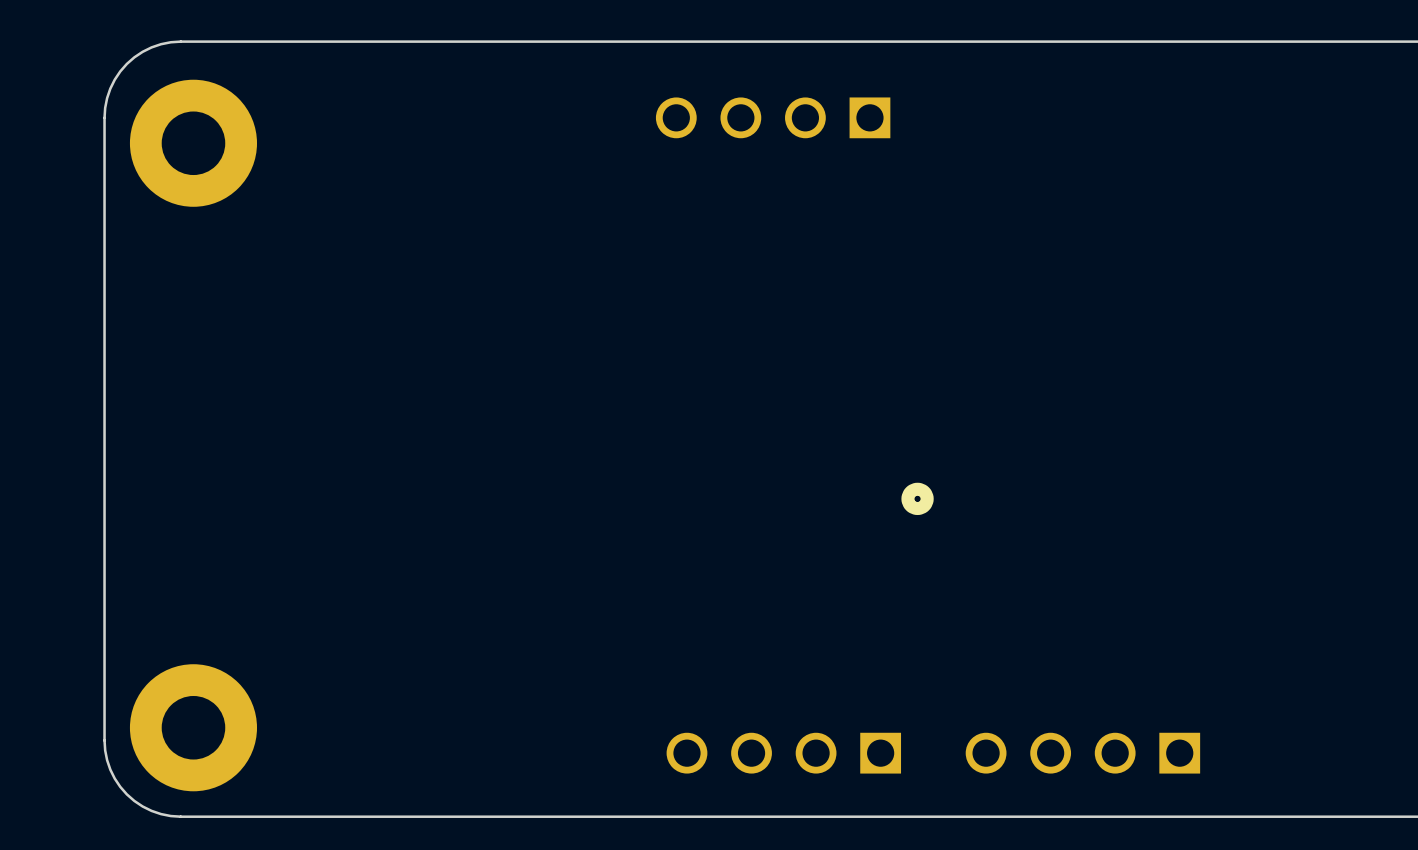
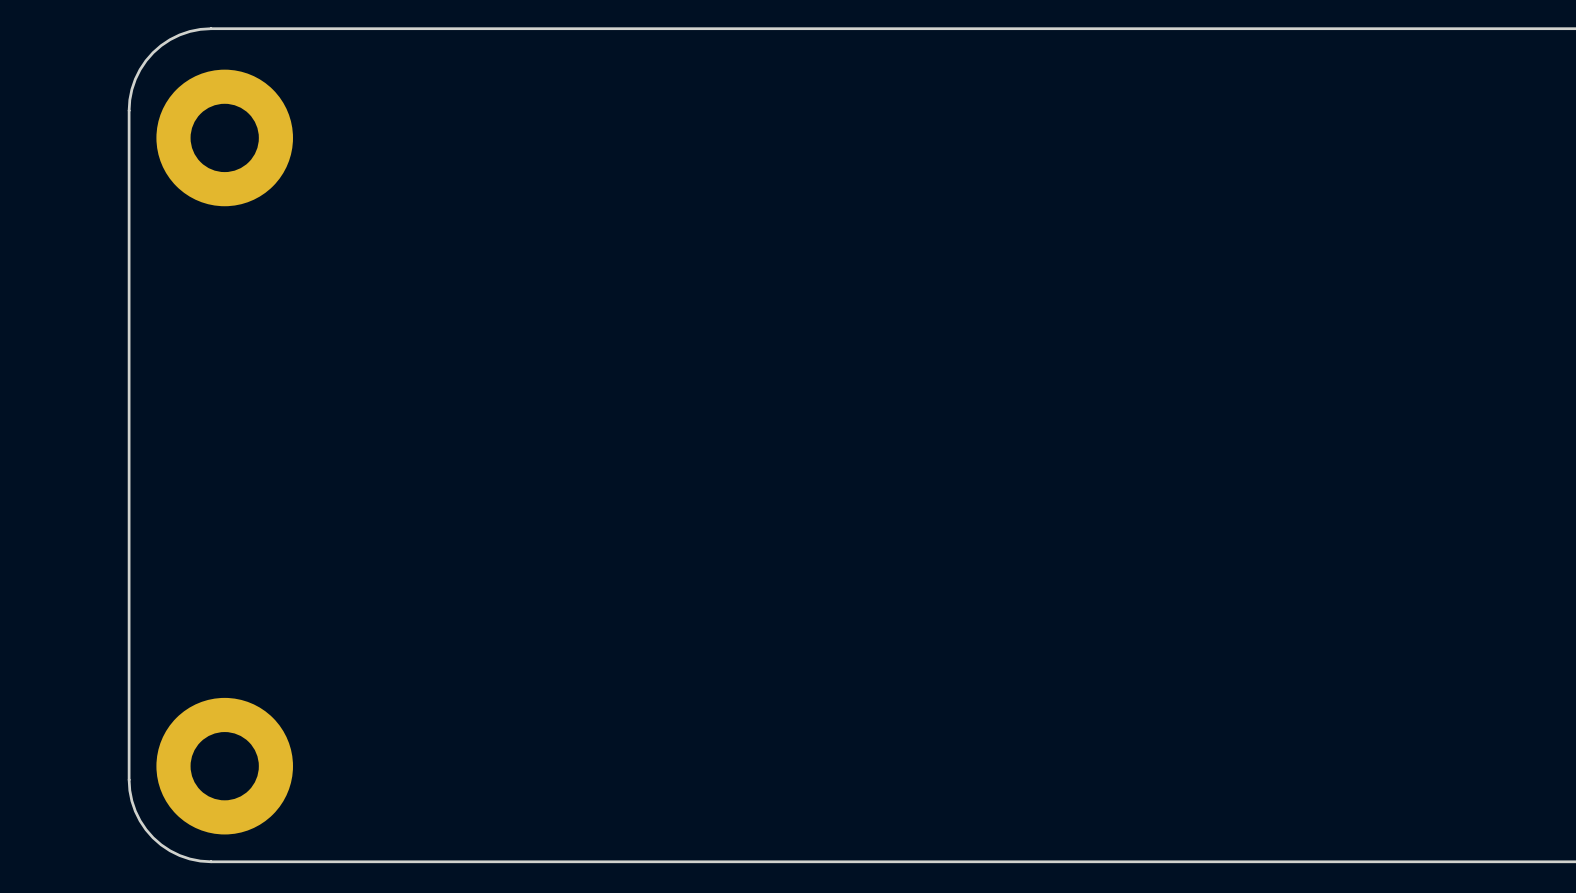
part: (773, 117) -> none
part: (917, 498) -> none
part: (783, 753) -> none
part: (1082, 753) -> none

